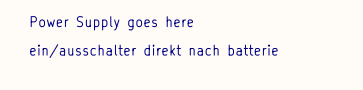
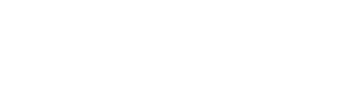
text: Power Supply goes here (111, 23) -> none
text: ein/ausschalter direkt nach batterie (153, 51) -> none

